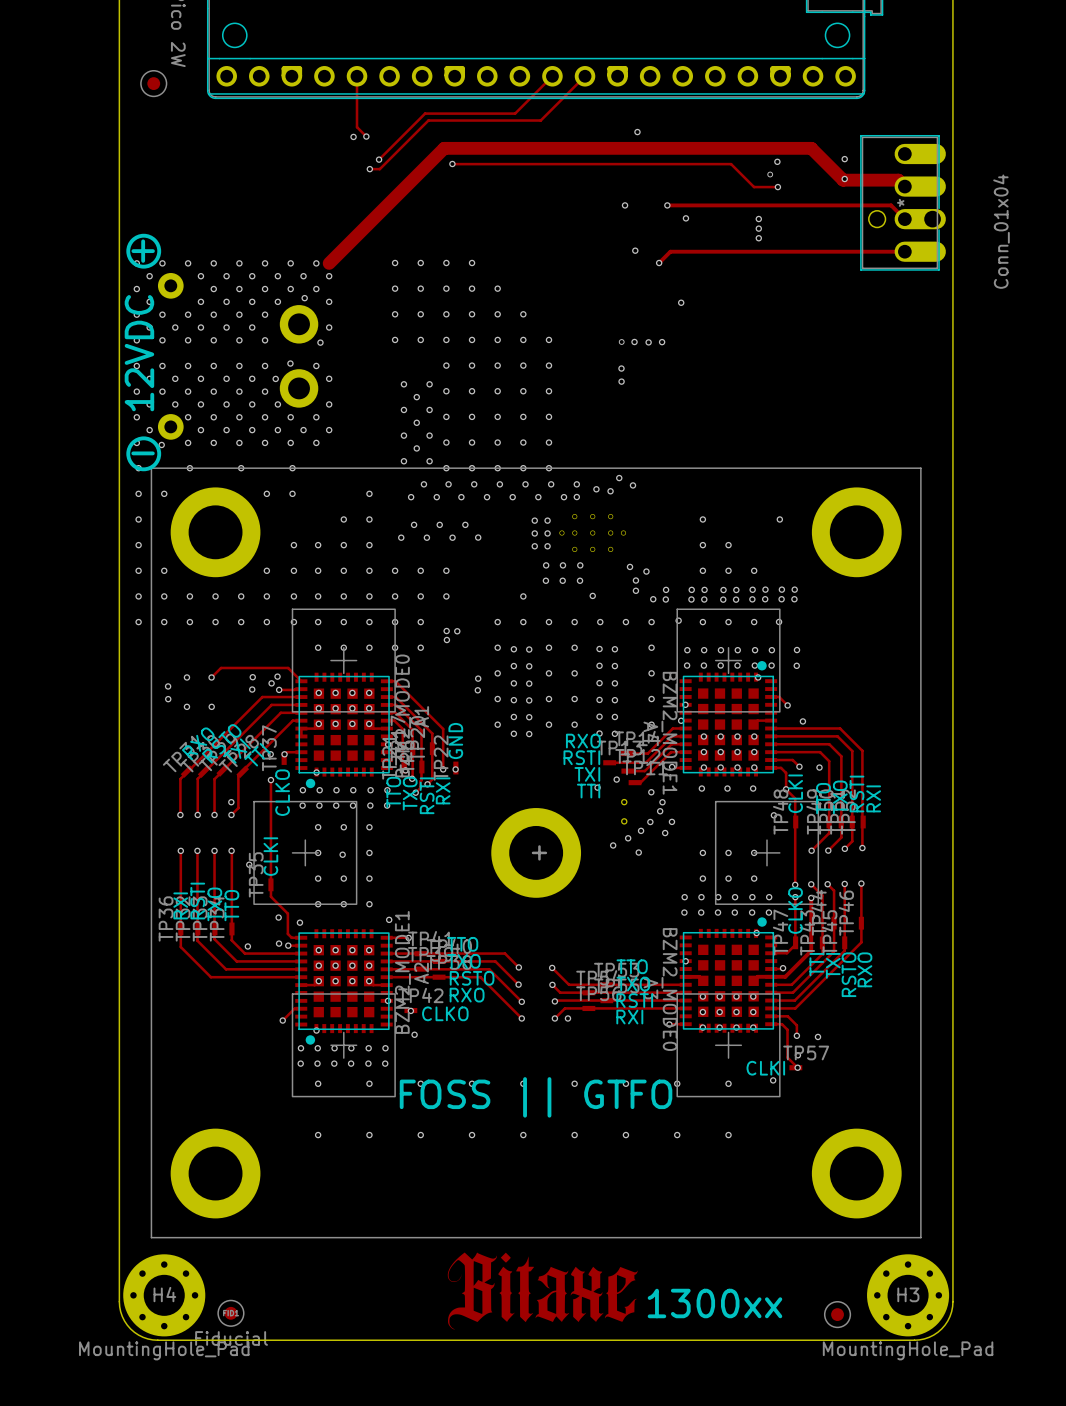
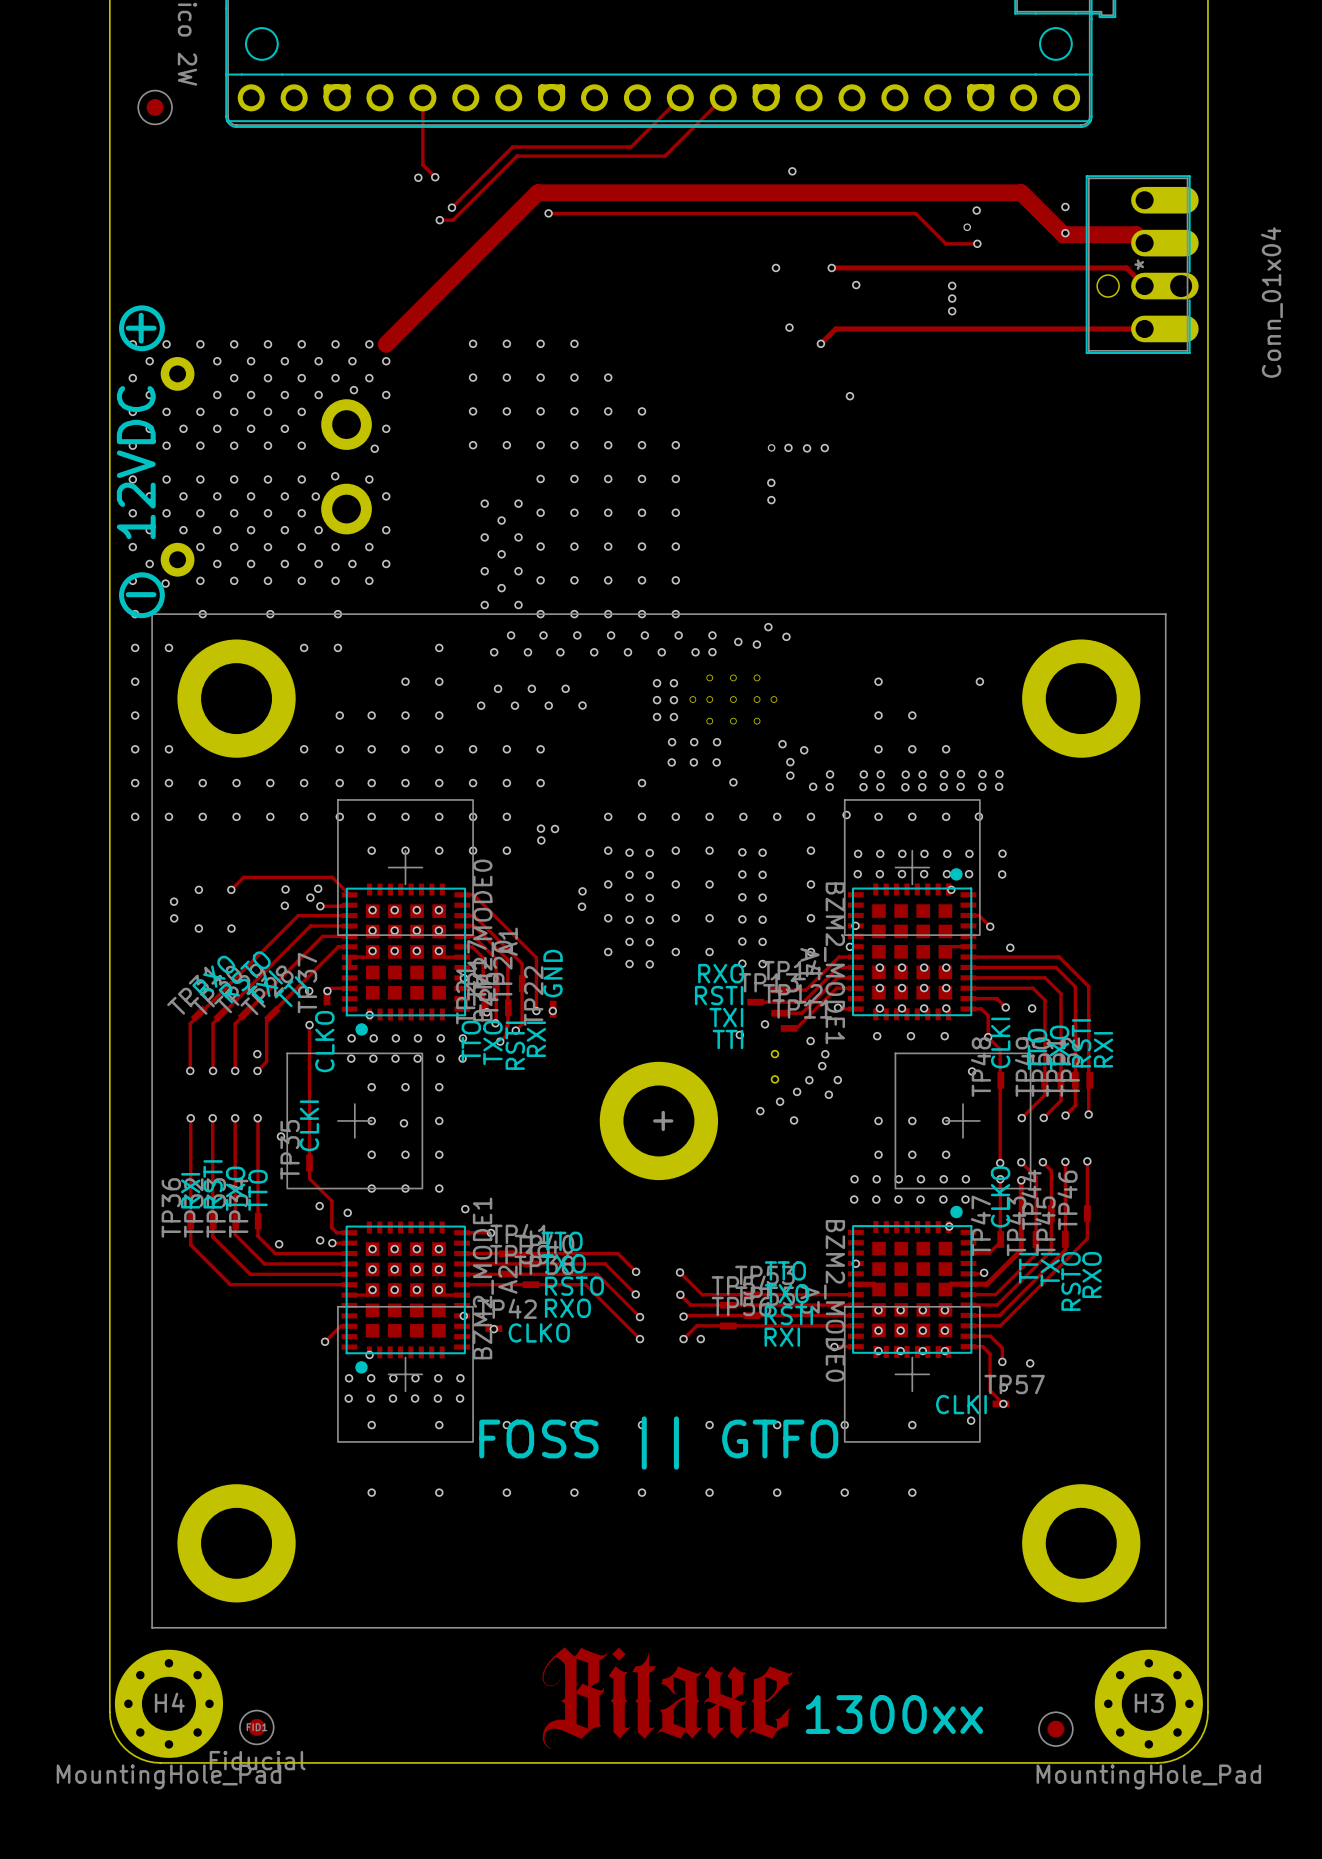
via: (414, 1034) -> none

